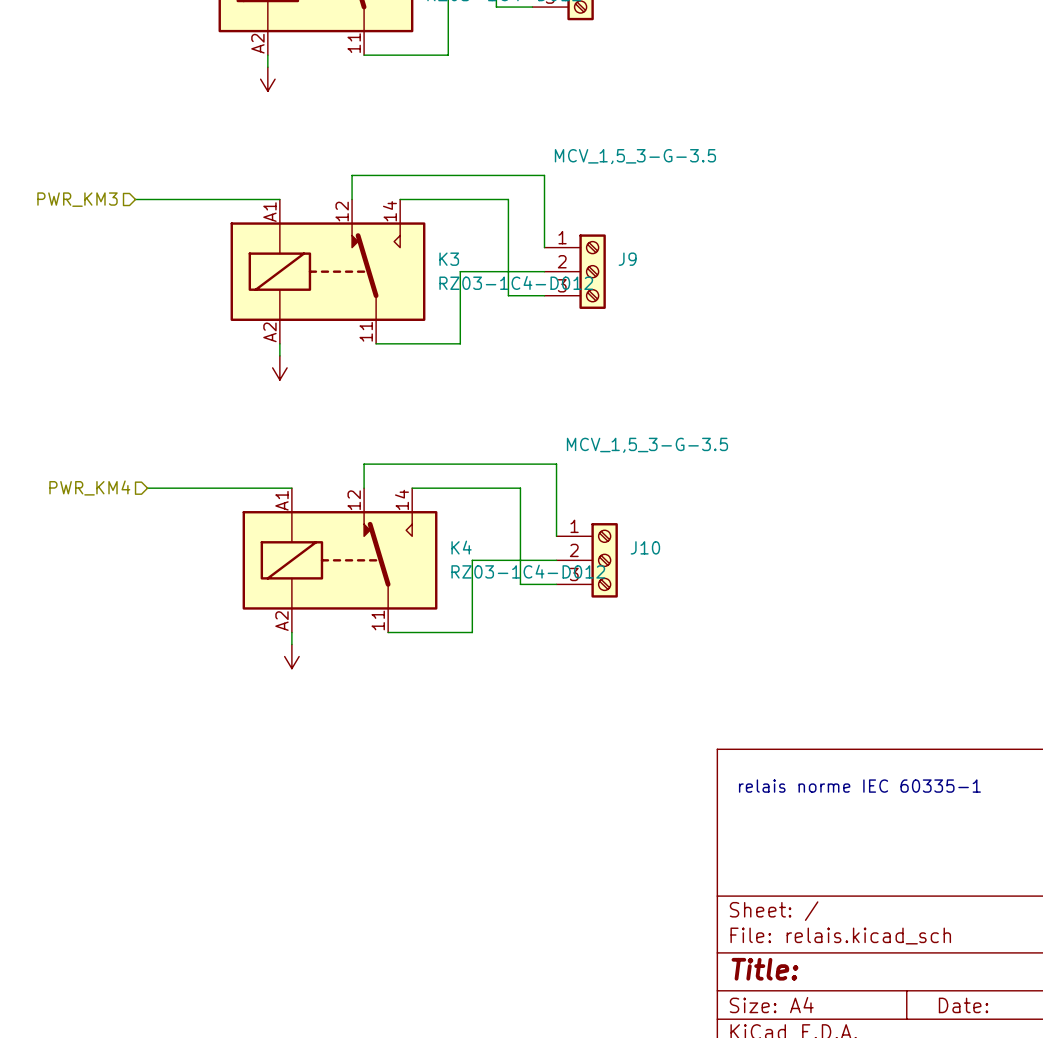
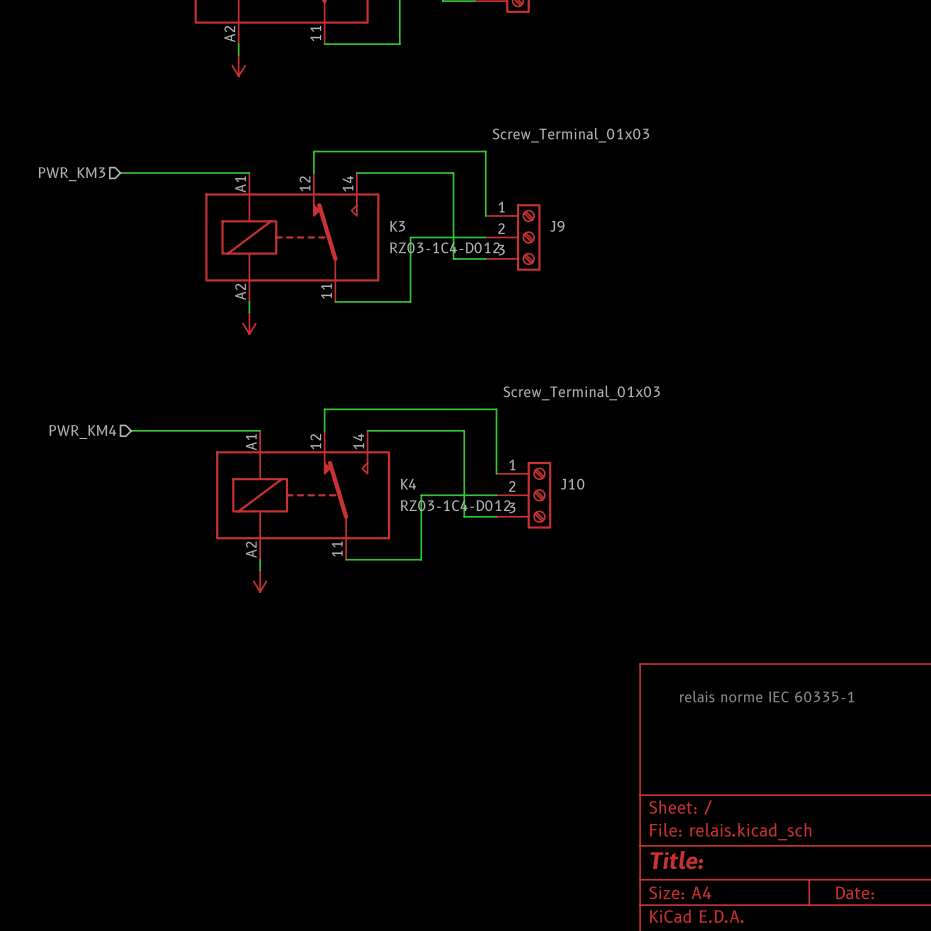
J9 value: MCV_1,5_3-G-3.5 (635, 156) -> Screw_Terminal_01x03 (570, 135)
J10 value: MCV_1,5_3-G-3.5 (647, 445) -> Screw_Terminal_01x03 (581, 393)

